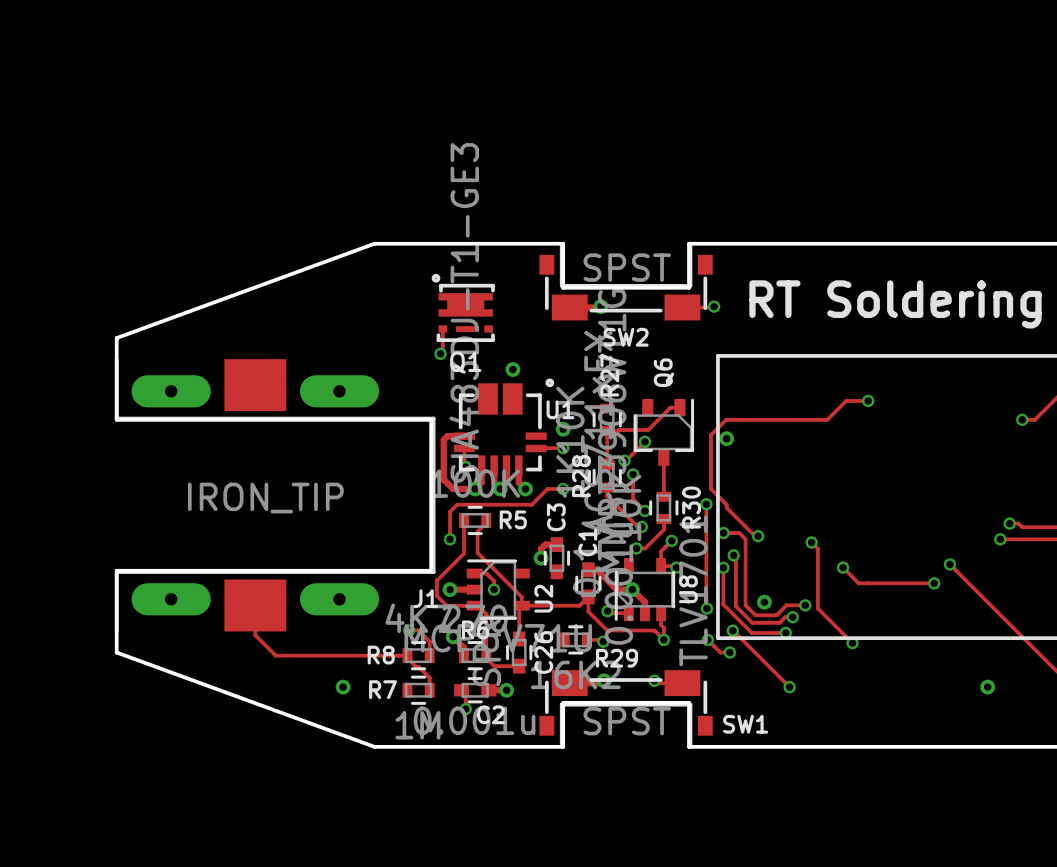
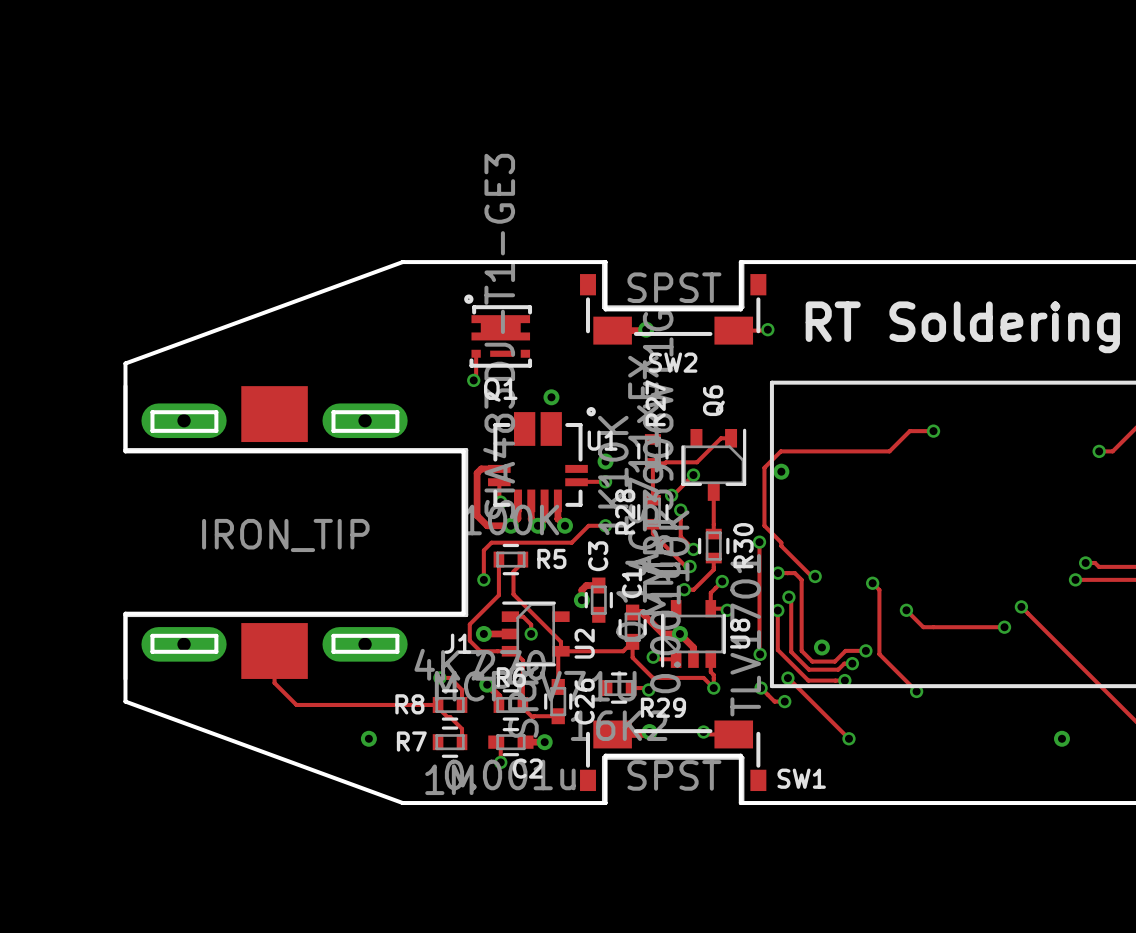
board edge: none -> (152, 412) (152, 430) (216, 430) (216, 412) (152, 412)
board edge: none -> (333, 412) (333, 430) (397, 430) (397, 412) (333, 412)
board edge: none -> (152, 635) (152, 651) (216, 651) (216, 635) (152, 635)
board edge: none -> (333, 635) (397, 635) (397, 651) (333, 651) (333, 635)

